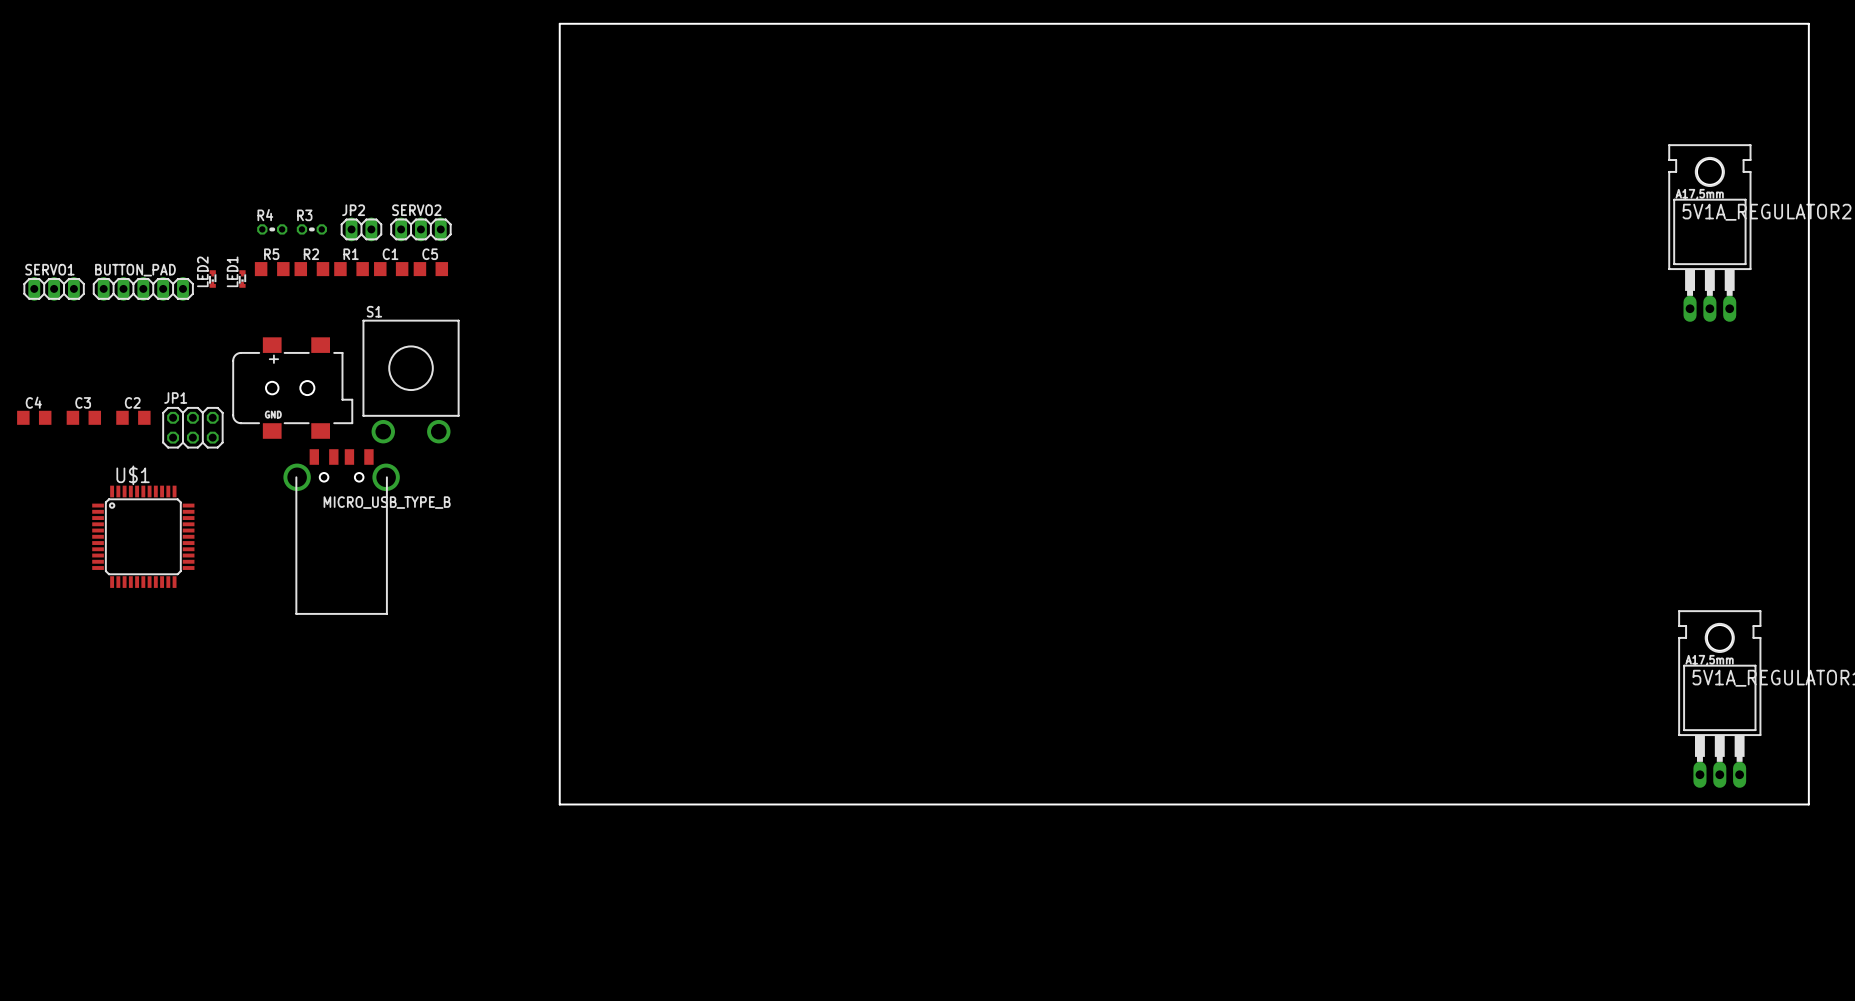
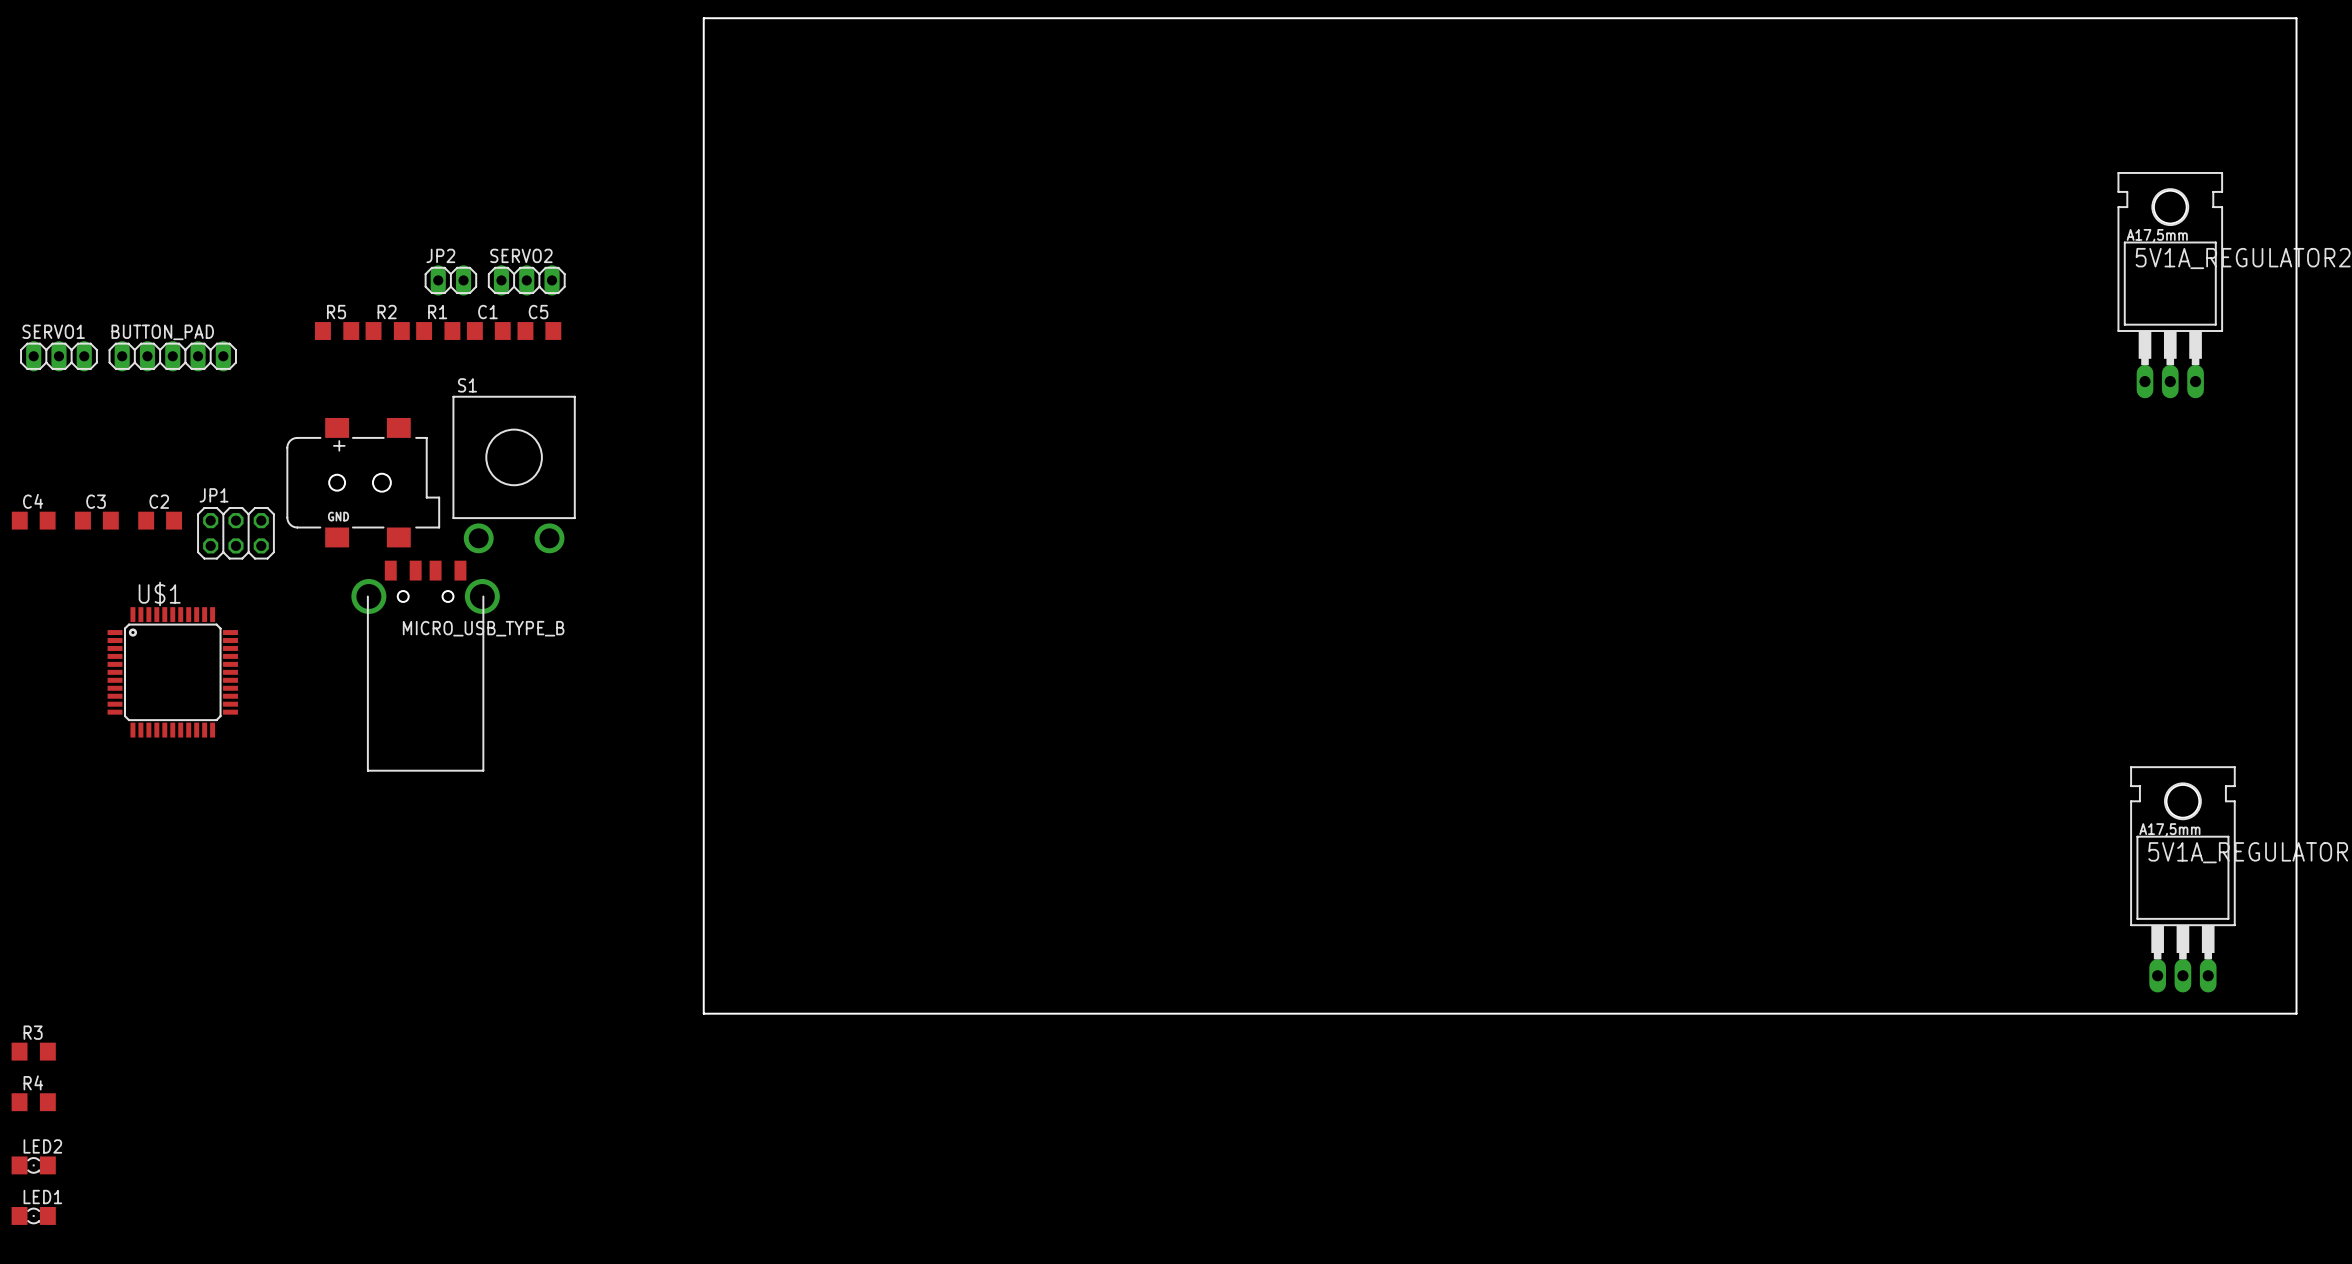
R4 footprint: [257, 224, 288, 235] -> [11, 1093, 56, 1112]
R3 footprint: [296, 224, 327, 235] -> [11, 1042, 56, 1061]
LED2 footprint: [209, 270, 216, 288] -> [11, 1156, 56, 1175]
LED1 footprint: [239, 270, 246, 288] -> [11, 1207, 56, 1225]
LED2 name position: LED2 (202, 271) -> LED2 (42, 1146)
LED1 name position: LED1 (232, 271) -> LED1 (42, 1197)

